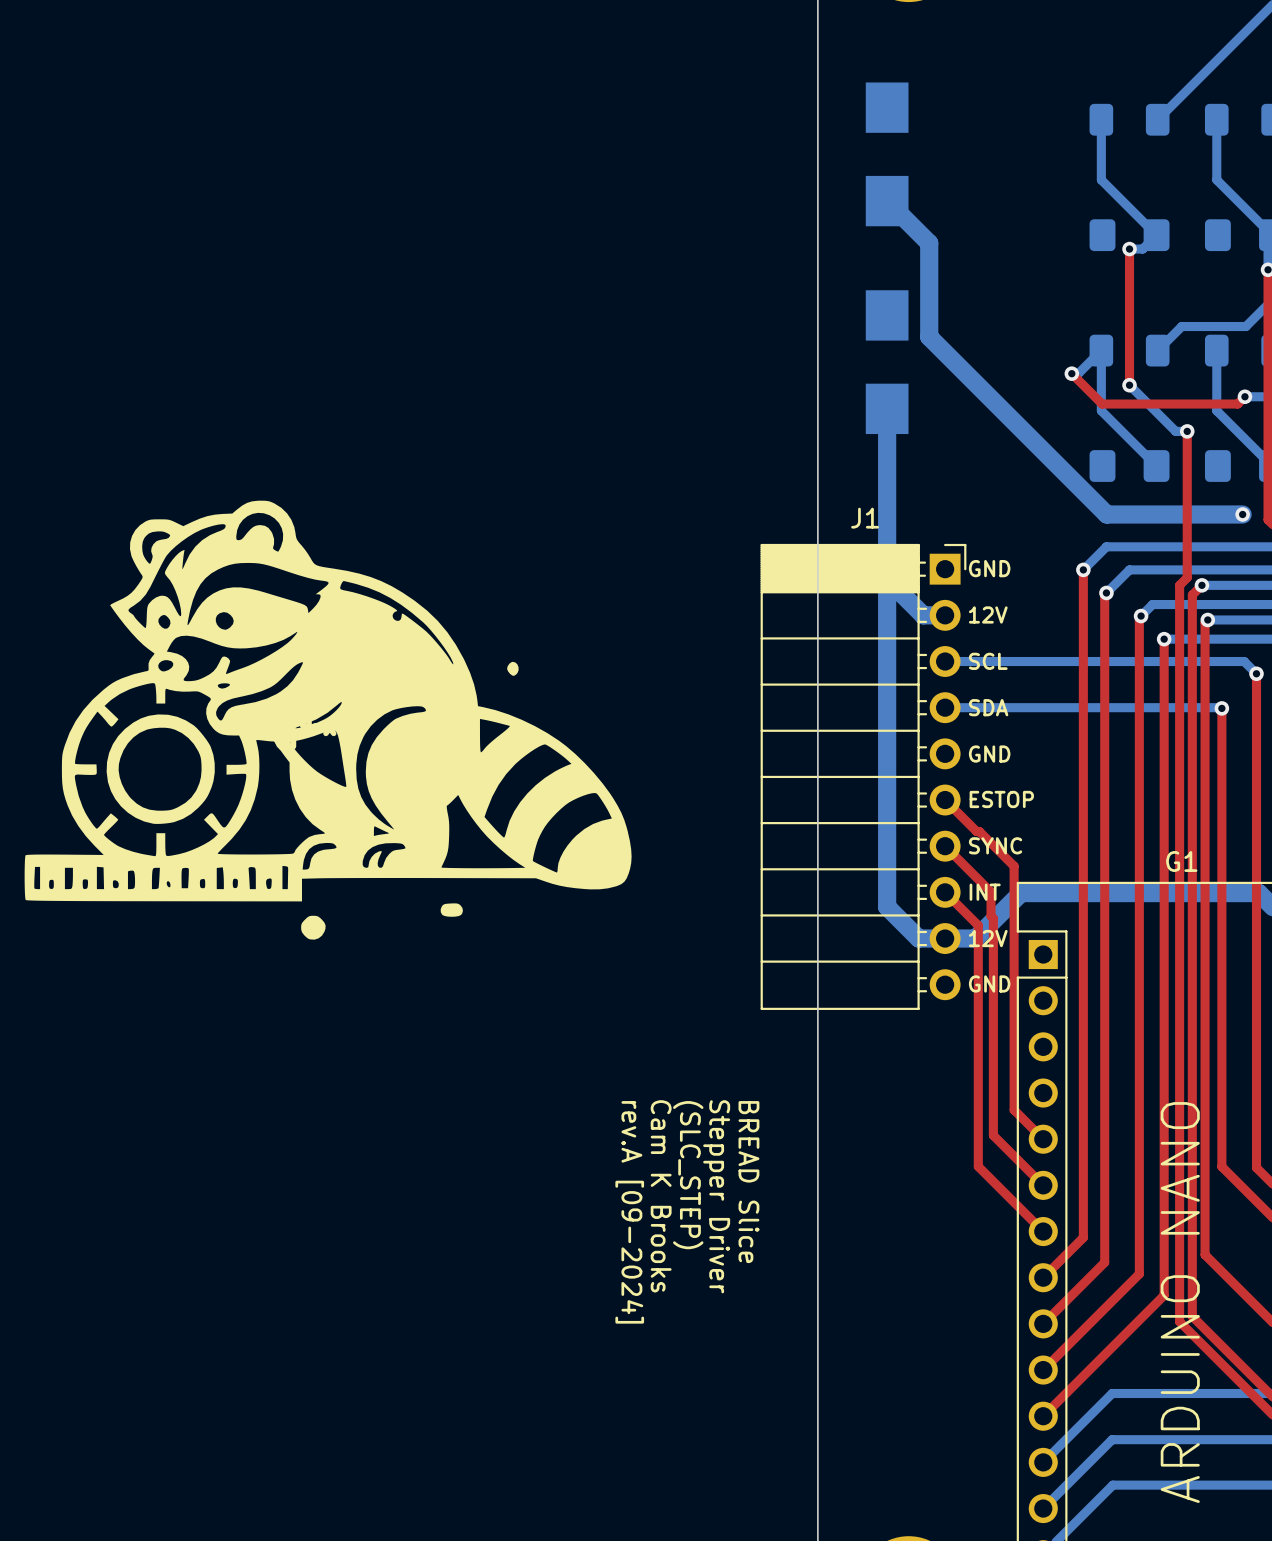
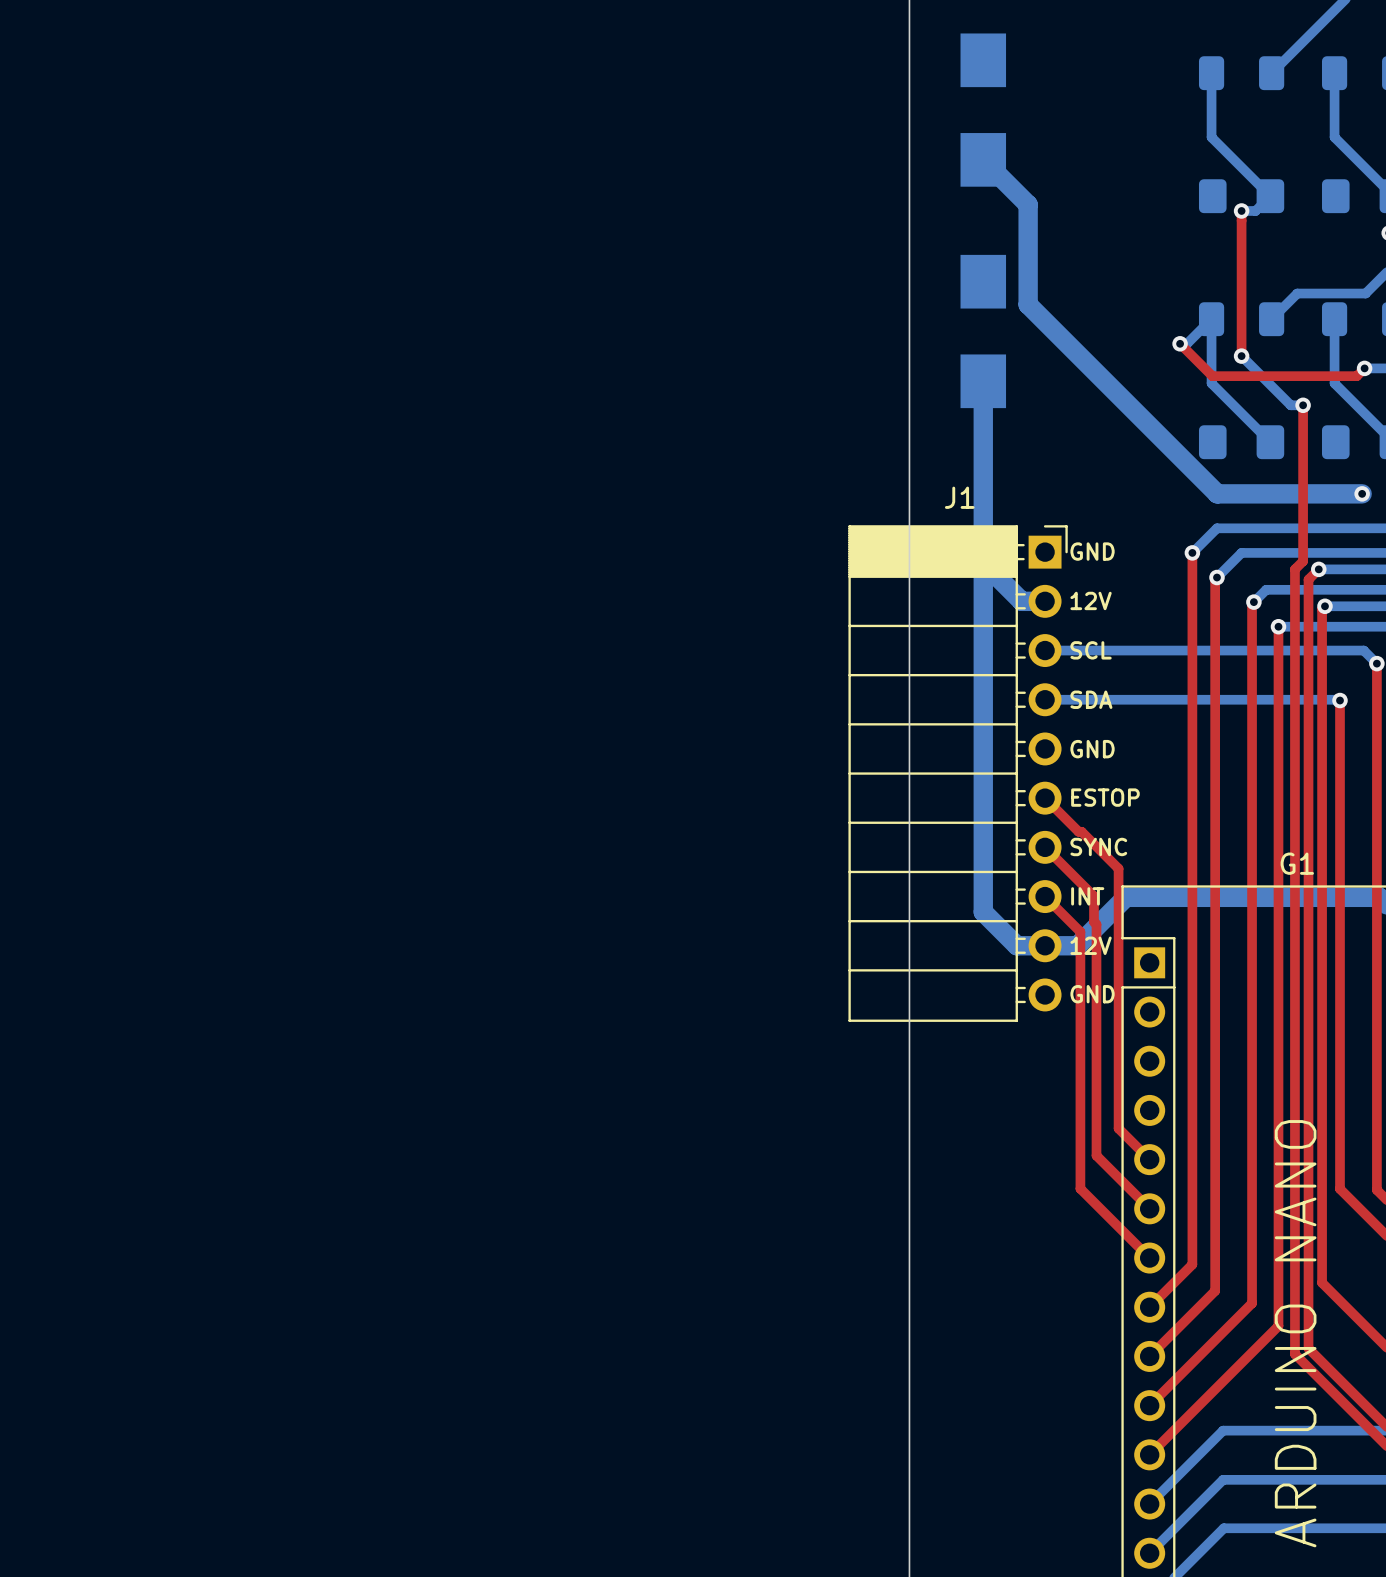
part: (328, 720) -> none
text: (SLC_STEP) (688, 1175) -> none
text: BREAD Slice (748, 1182) -> none
text: Cam K Brooks (661, 1196) -> none
text: Stepper Driver (716, 1196) -> none
text: rev.A [09-2024] (629, 1212) -> none

